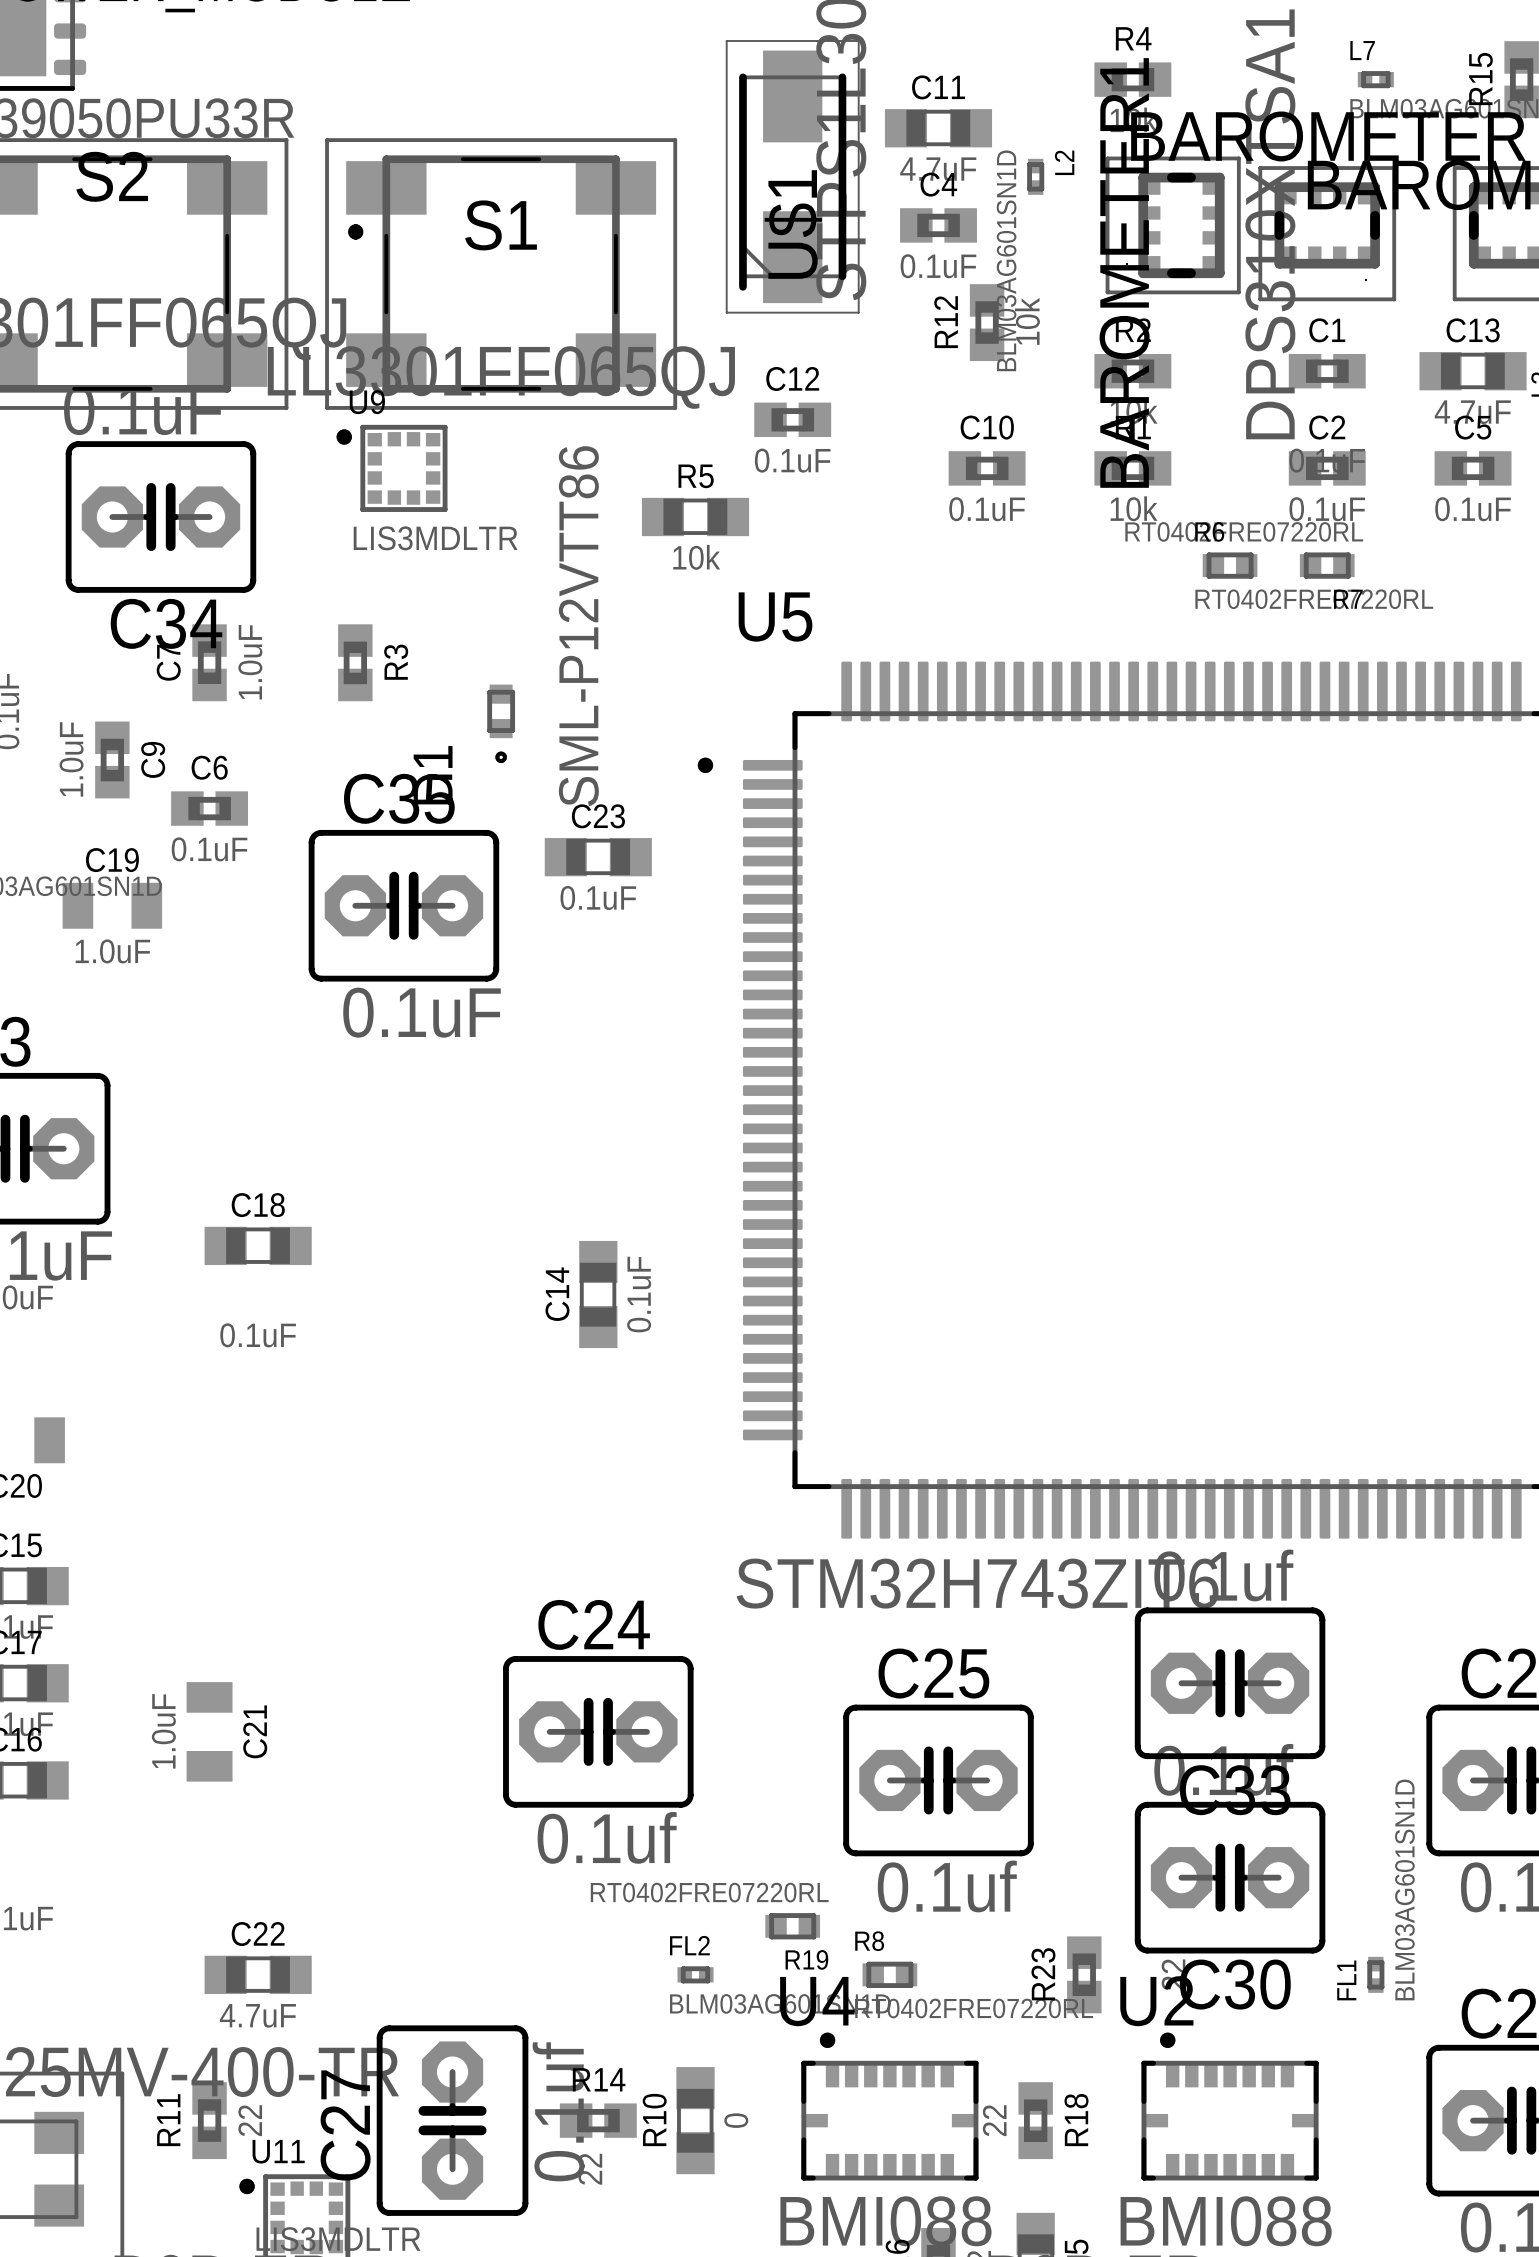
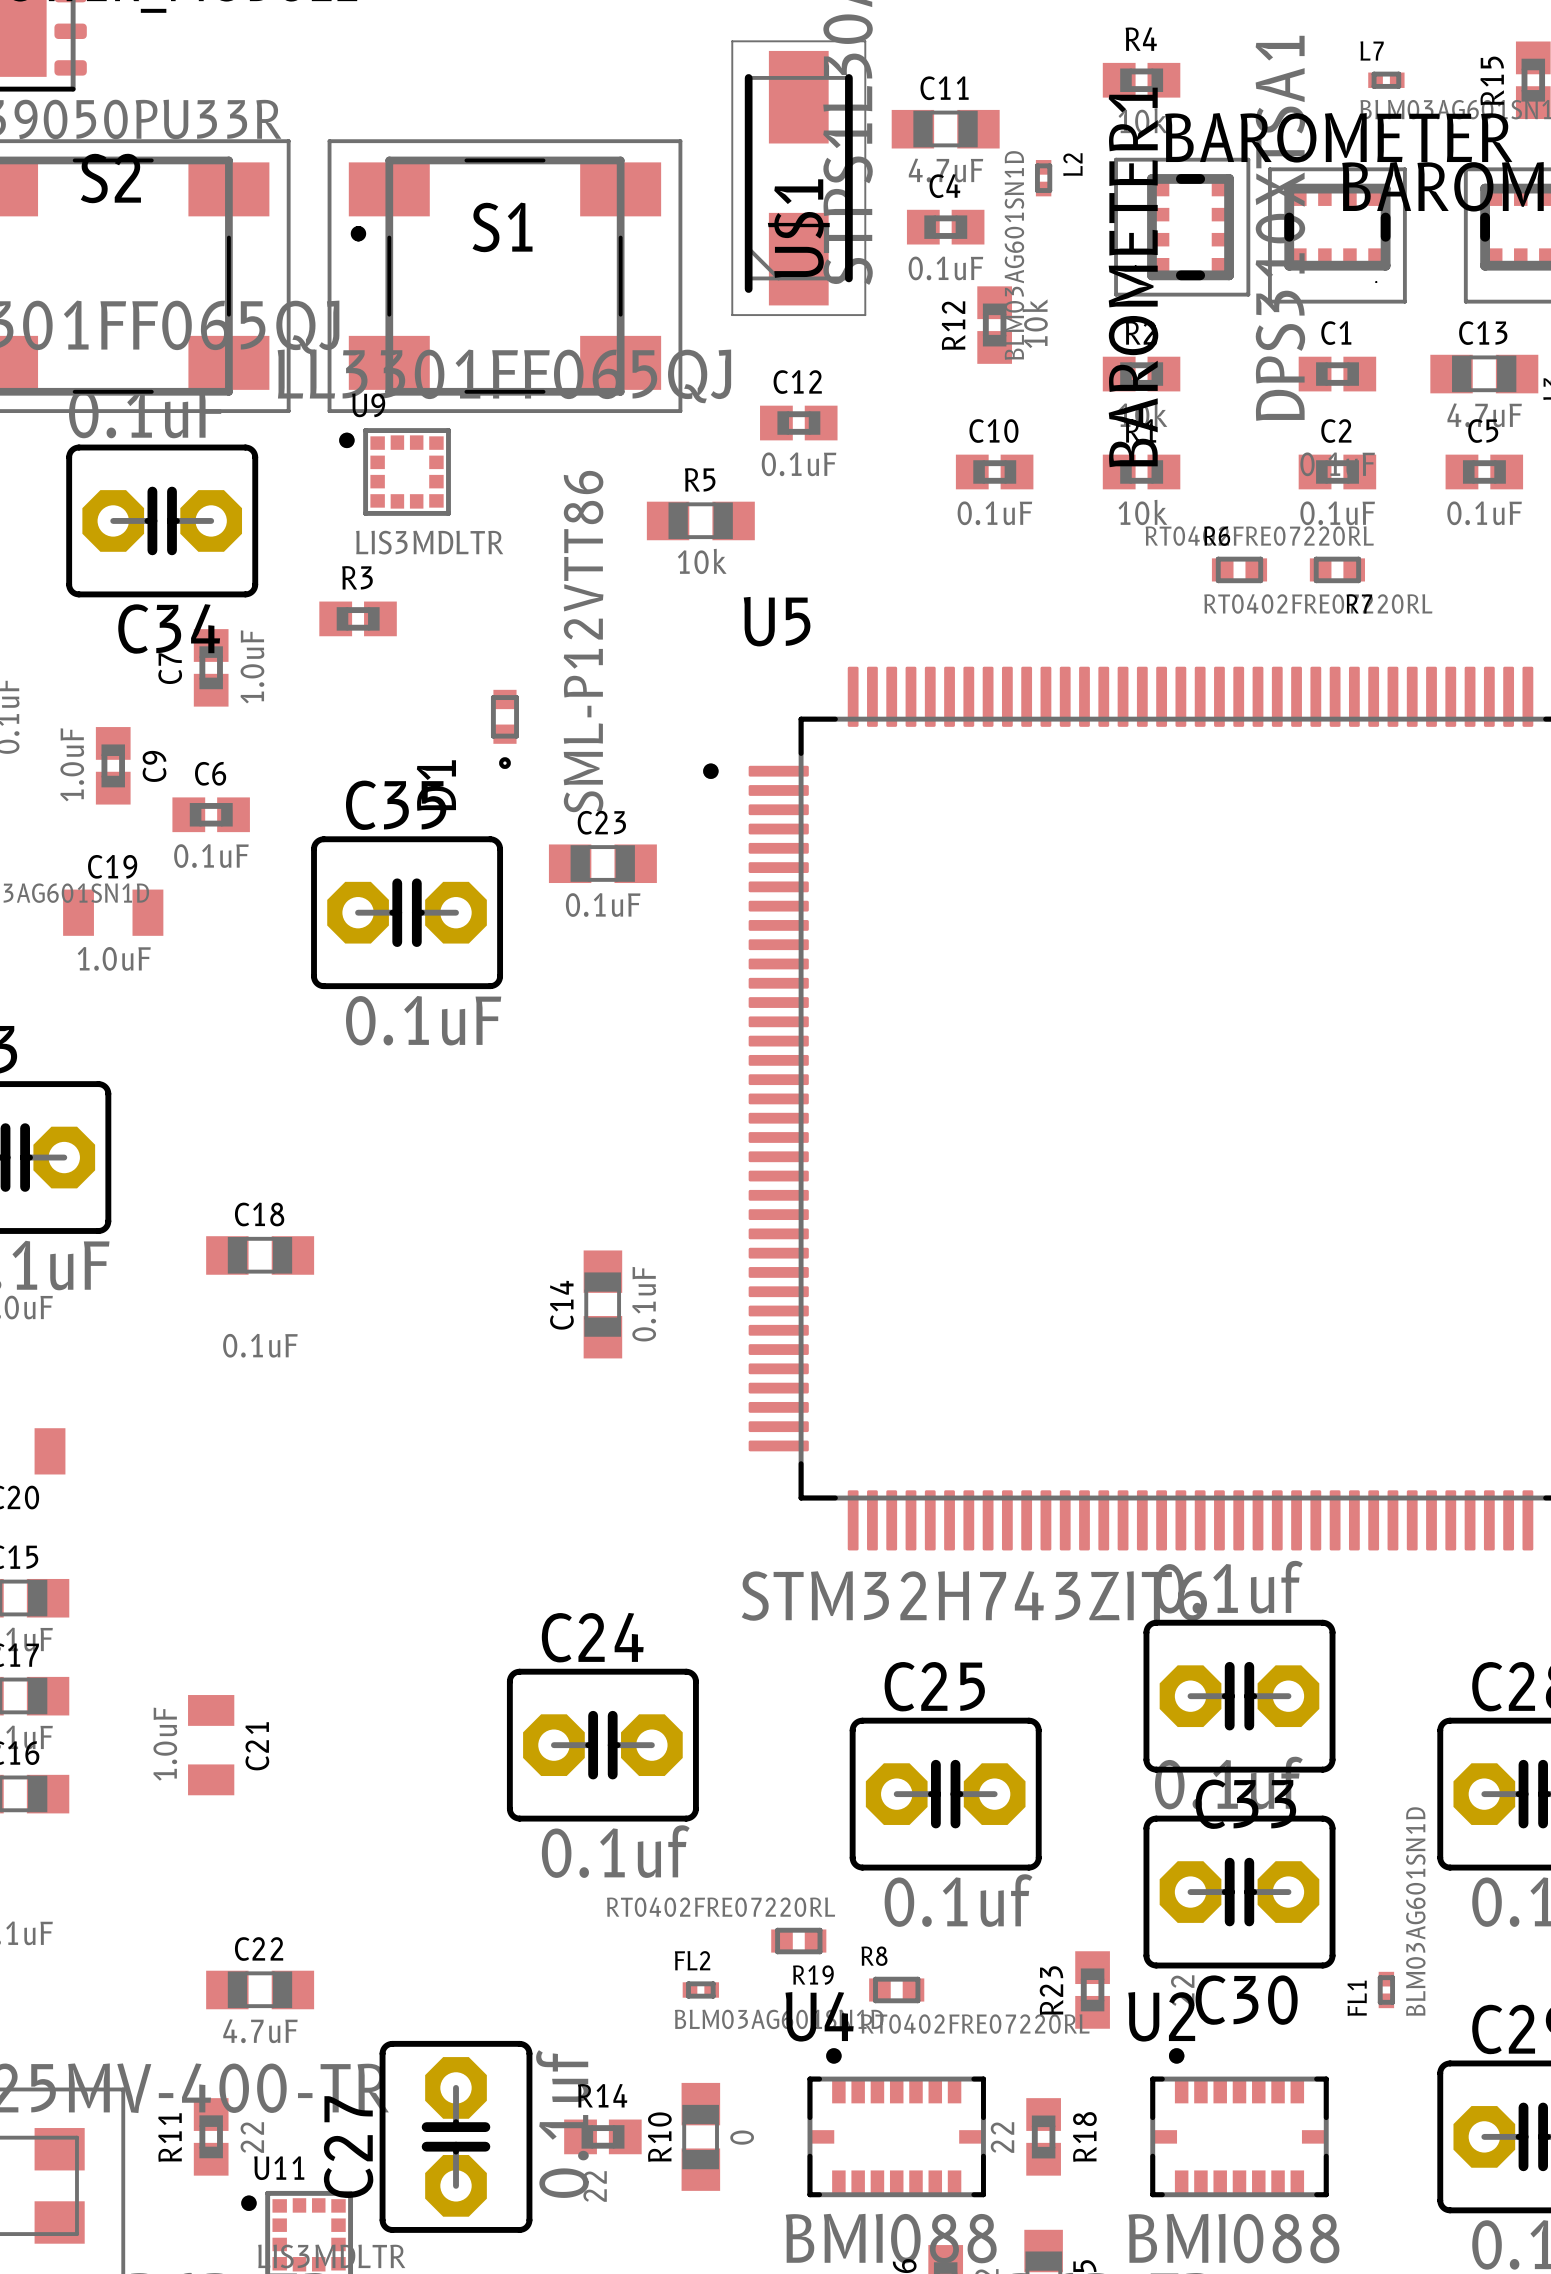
R3 rotation: 0° (355, 662) -> 90° clockwise (358, 618)
R3 position: (355, 662) -> (358, 618)

